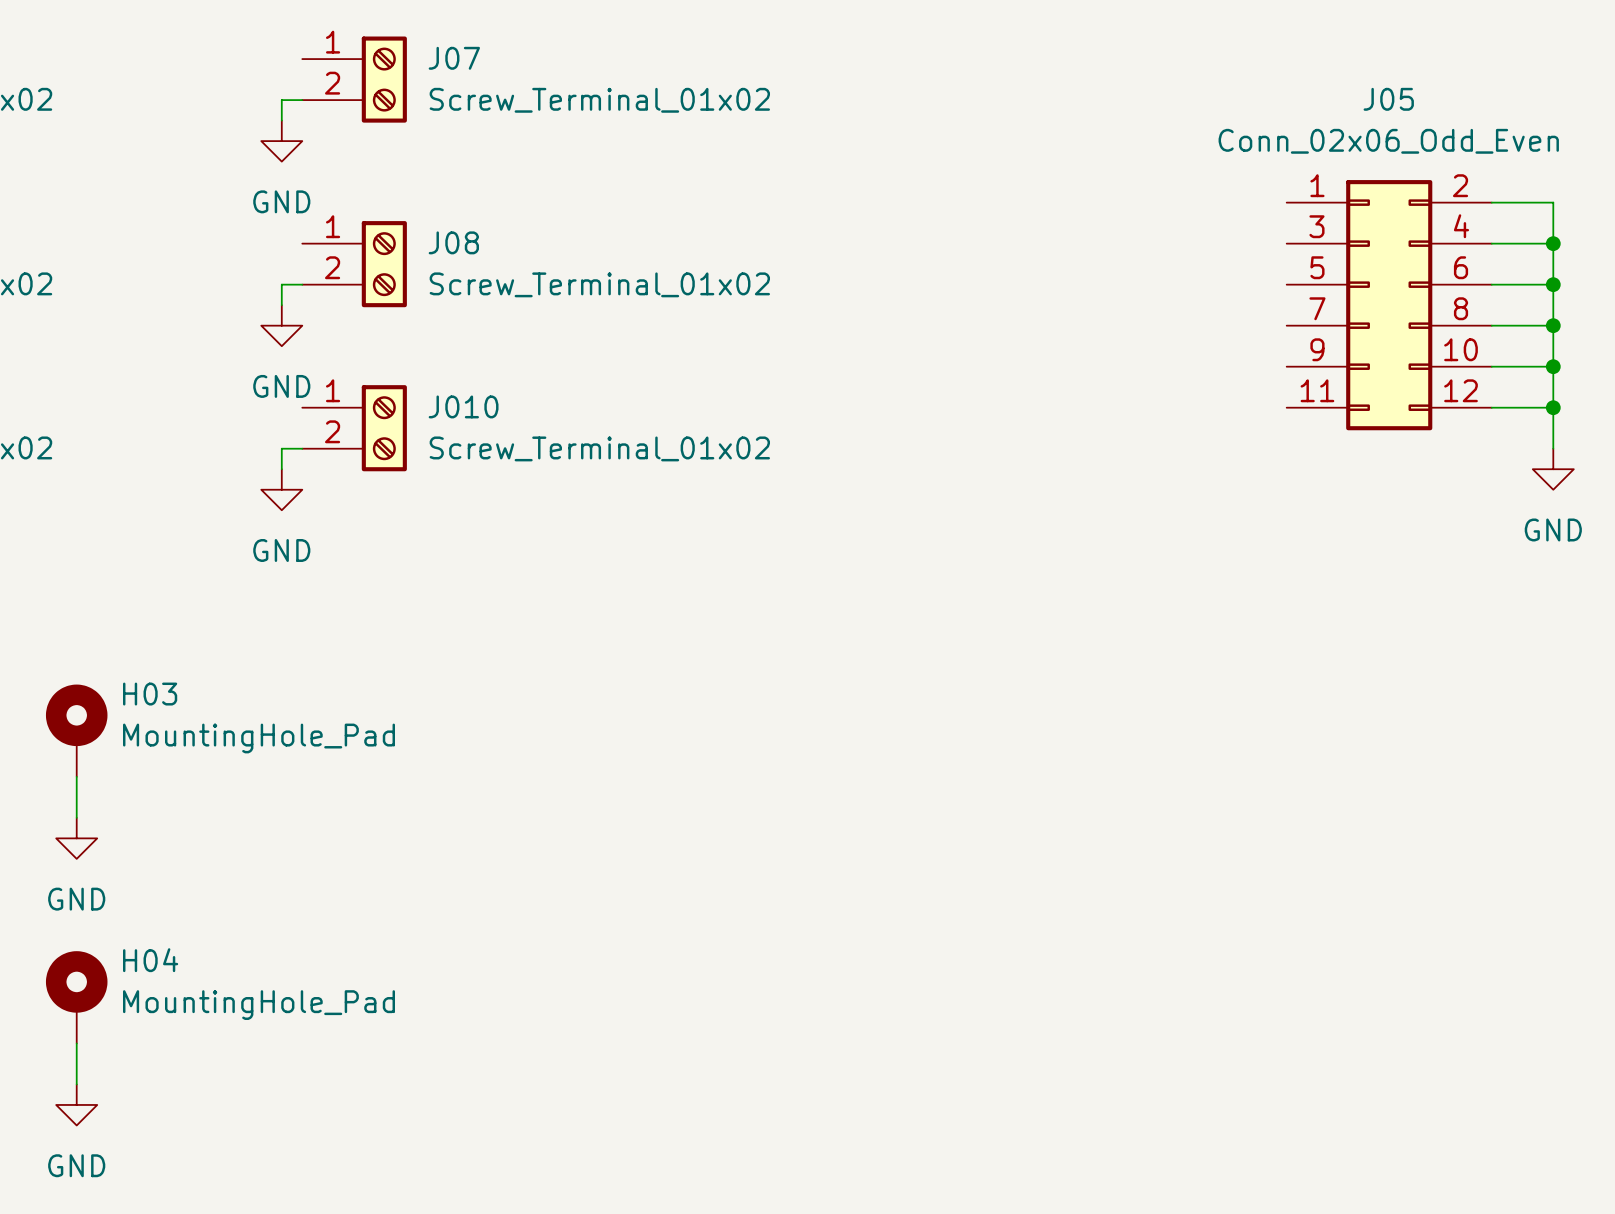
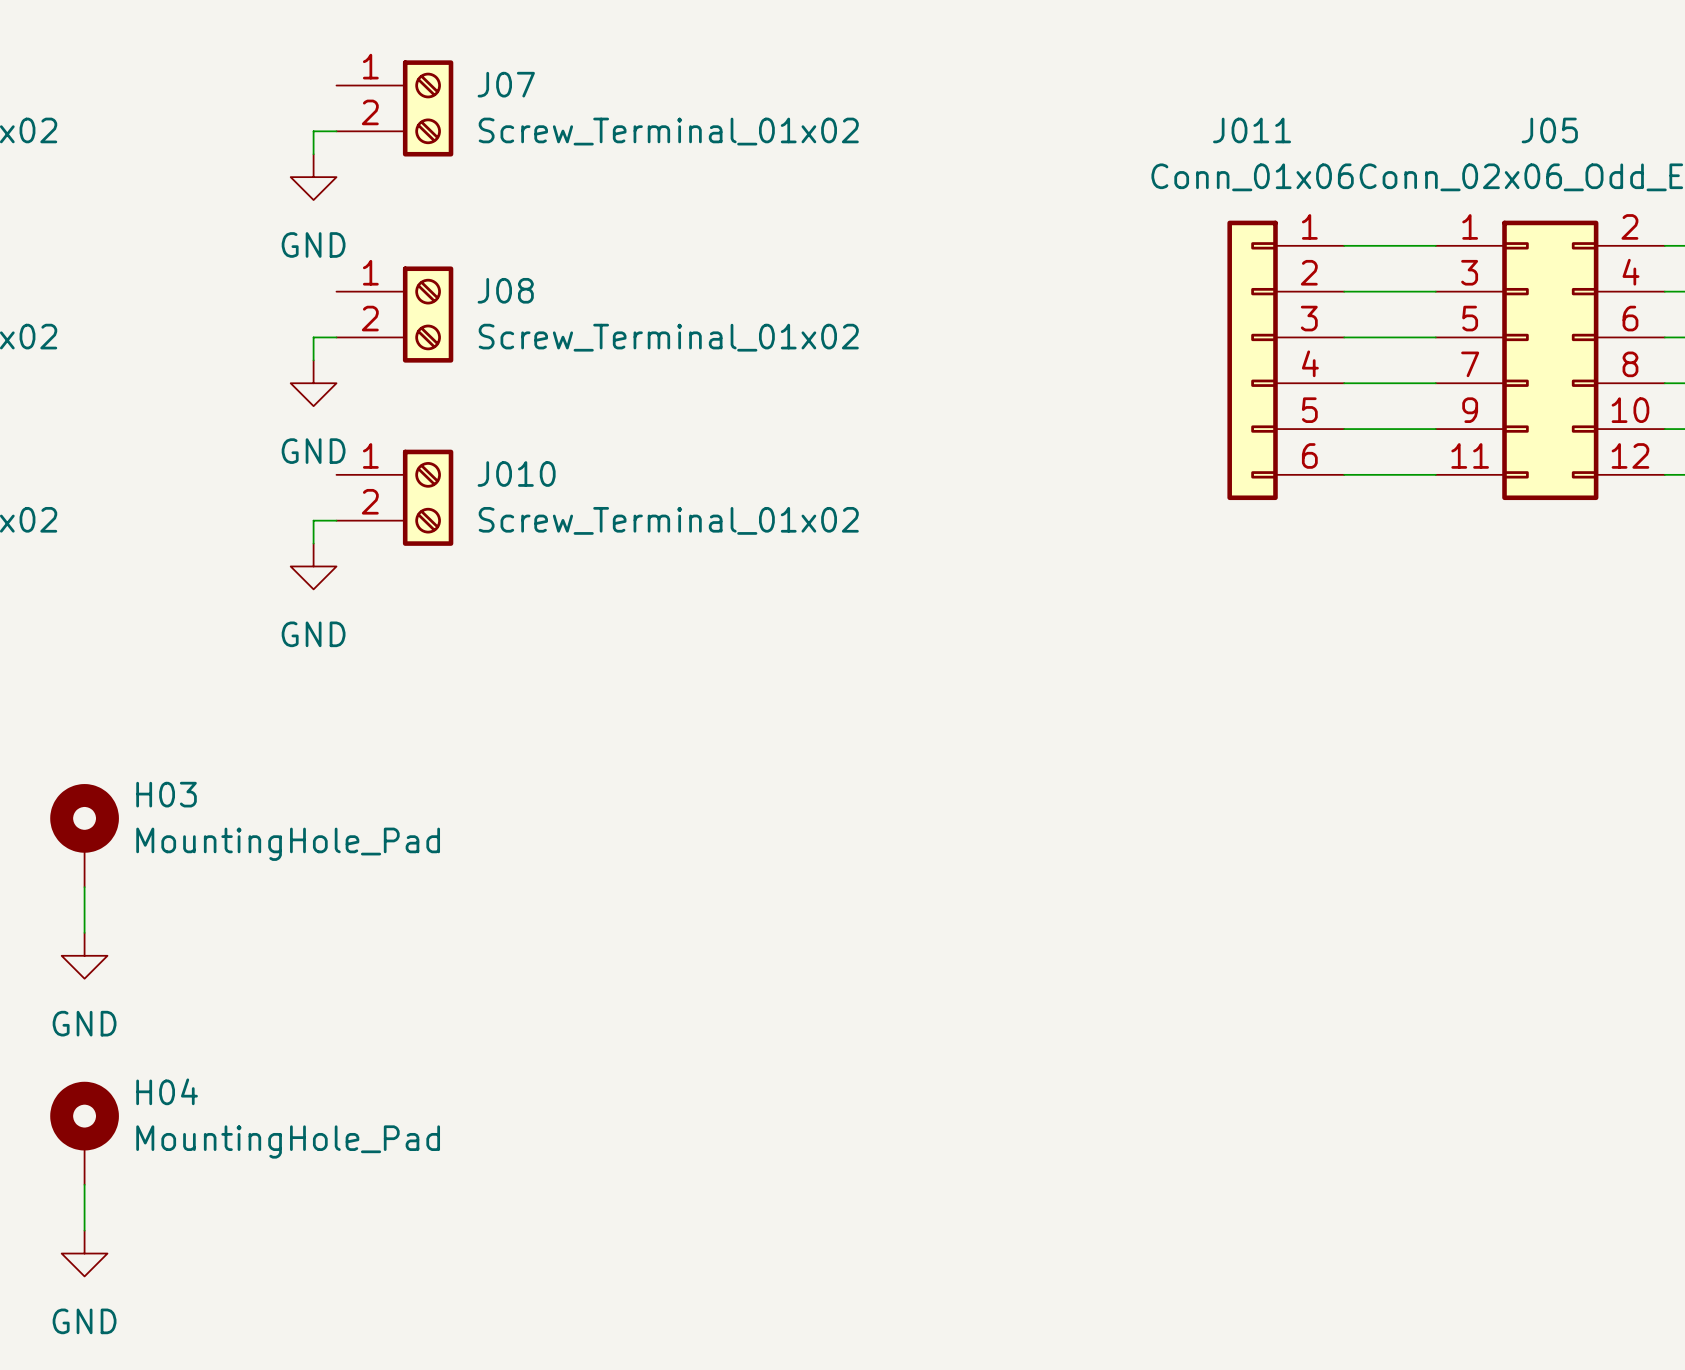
wire: none -> (1344, 245) (1435, 245)
wire: none -> (1344, 291) (1435, 291)
wire: none -> (1344, 337) (1435, 337)
J011: none -> Conn_01x06 (1285, 360)
wire: none -> (1344, 383) (1435, 383)
wire: none -> (1344, 429) (1435, 429)
wire: none -> (1344, 474) (1435, 474)

